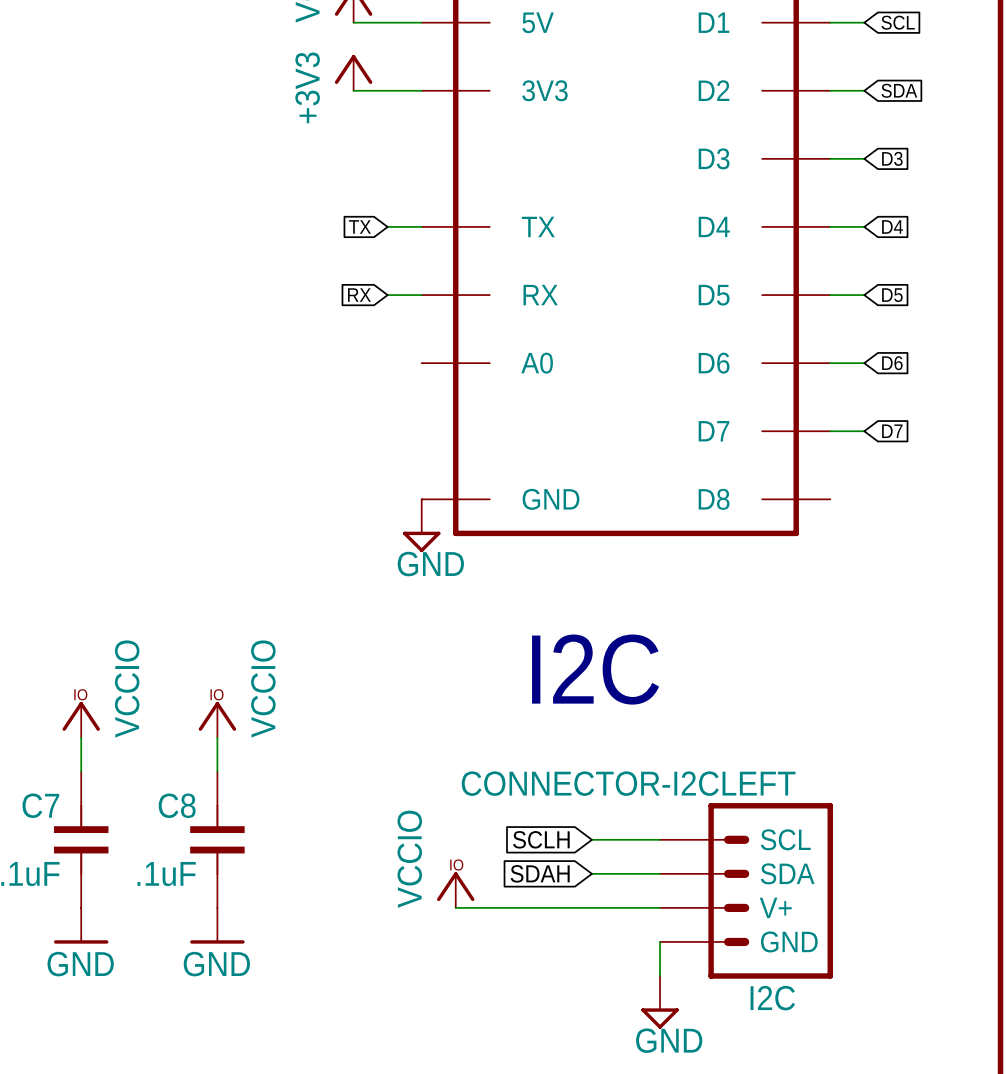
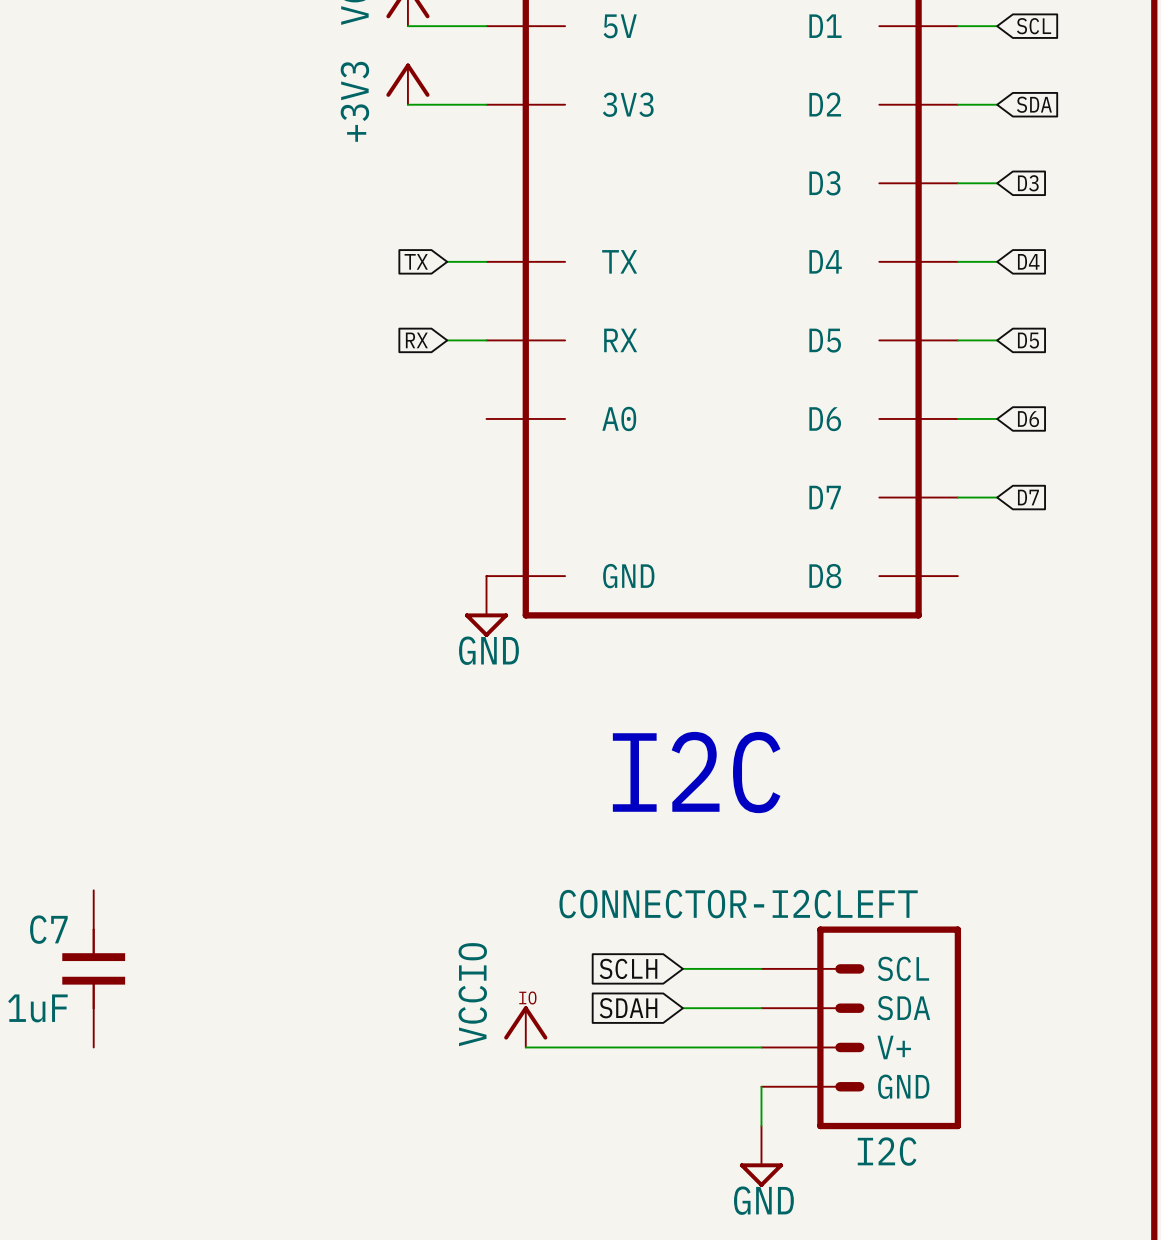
power symbol: VCCIO (81, 719) -> none
power symbol: VCCIO (217, 719) -> none
wire: (81, 737) (81, 771) -> none
wire: (217, 737) (217, 771) -> none
C8: .1uF (217, 839) -> none
power symbol: GND (81, 925) -> none
power symbol: GND (217, 925) -> none

